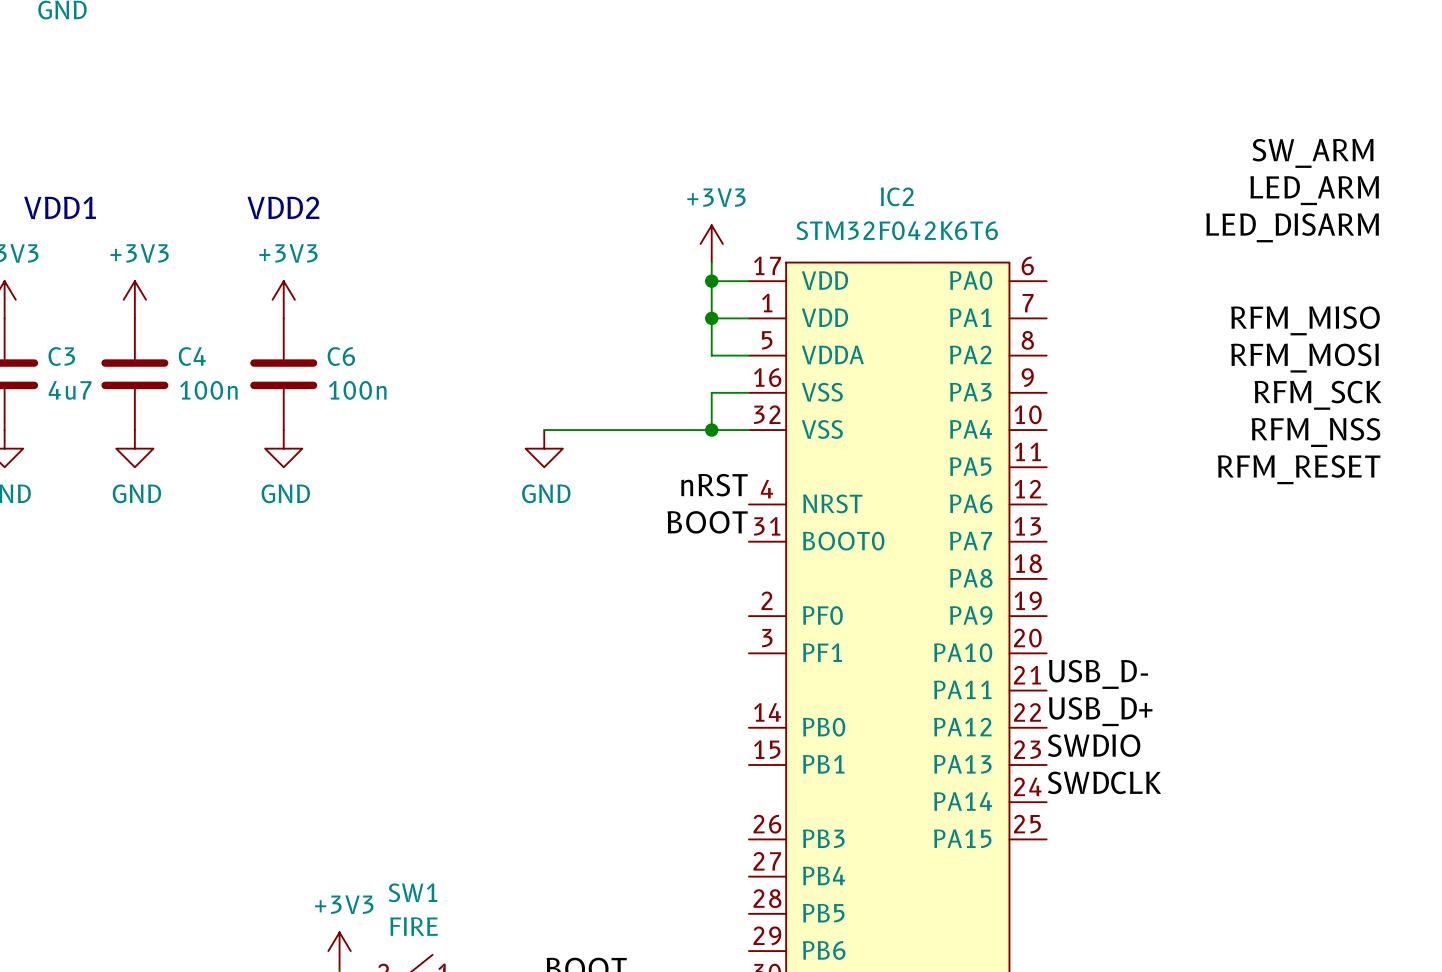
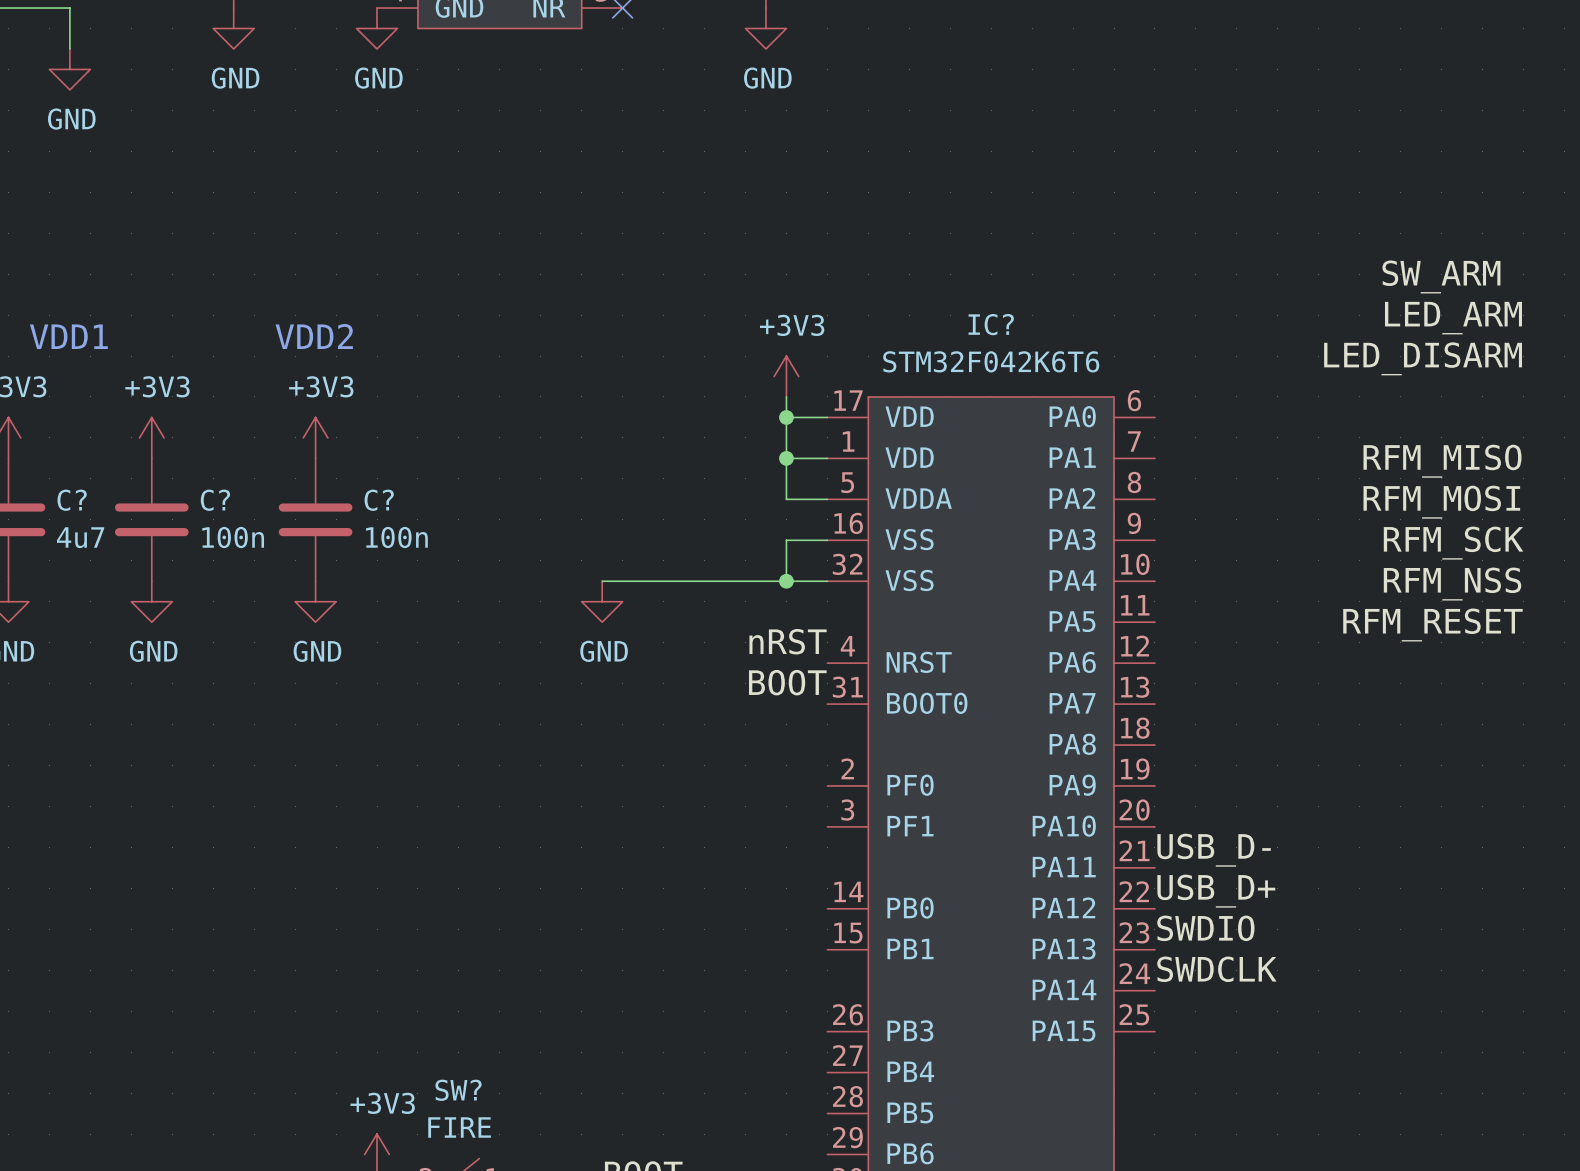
IC2 name: IC2 (897, 196) -> IC? (991, 324)
C3 name: C3 (61, 356) -> C? (72, 500)
C4 name: C4 (192, 356) -> C? (215, 500)
C6 name: C6 (341, 356) -> C? (379, 500)
SW1 name: SW1 (412, 892) -> SW? (458, 1090)

